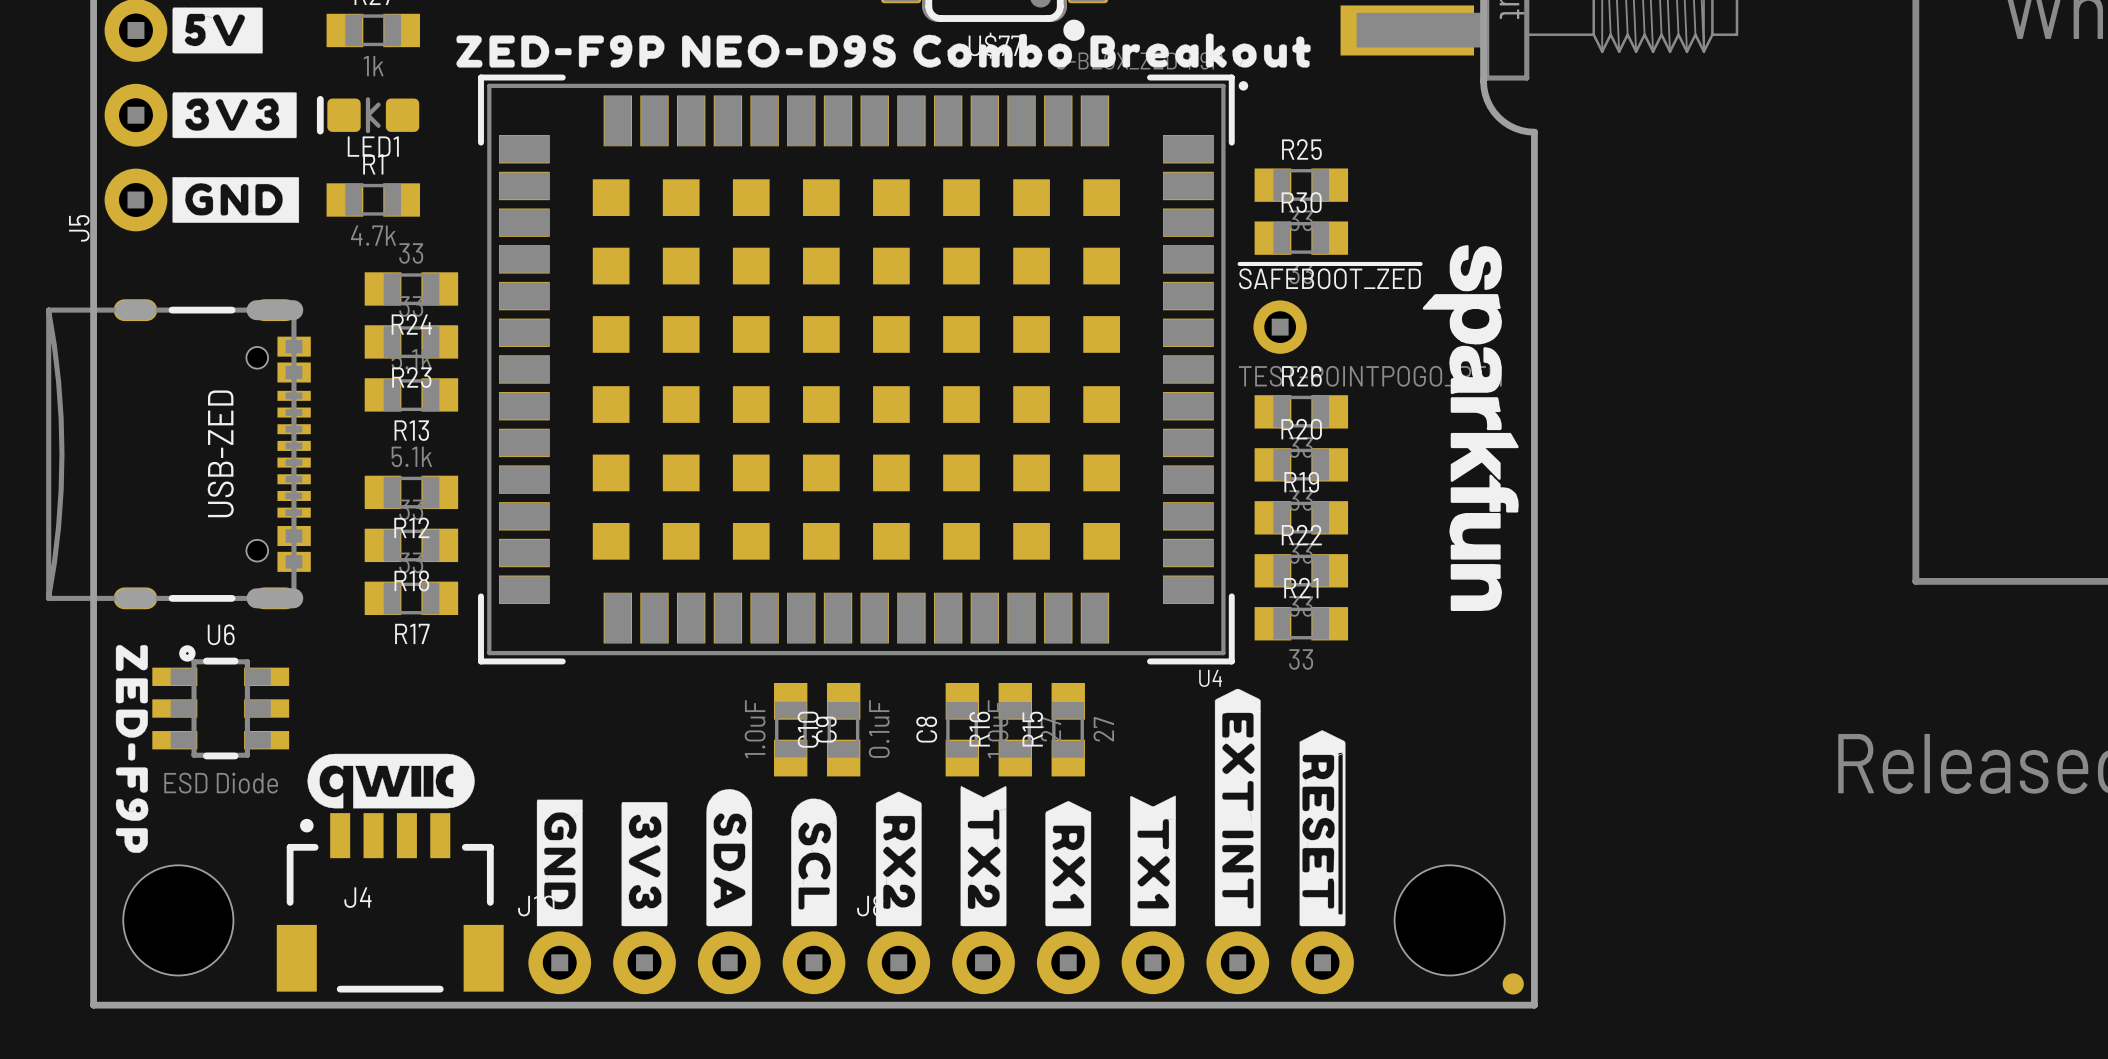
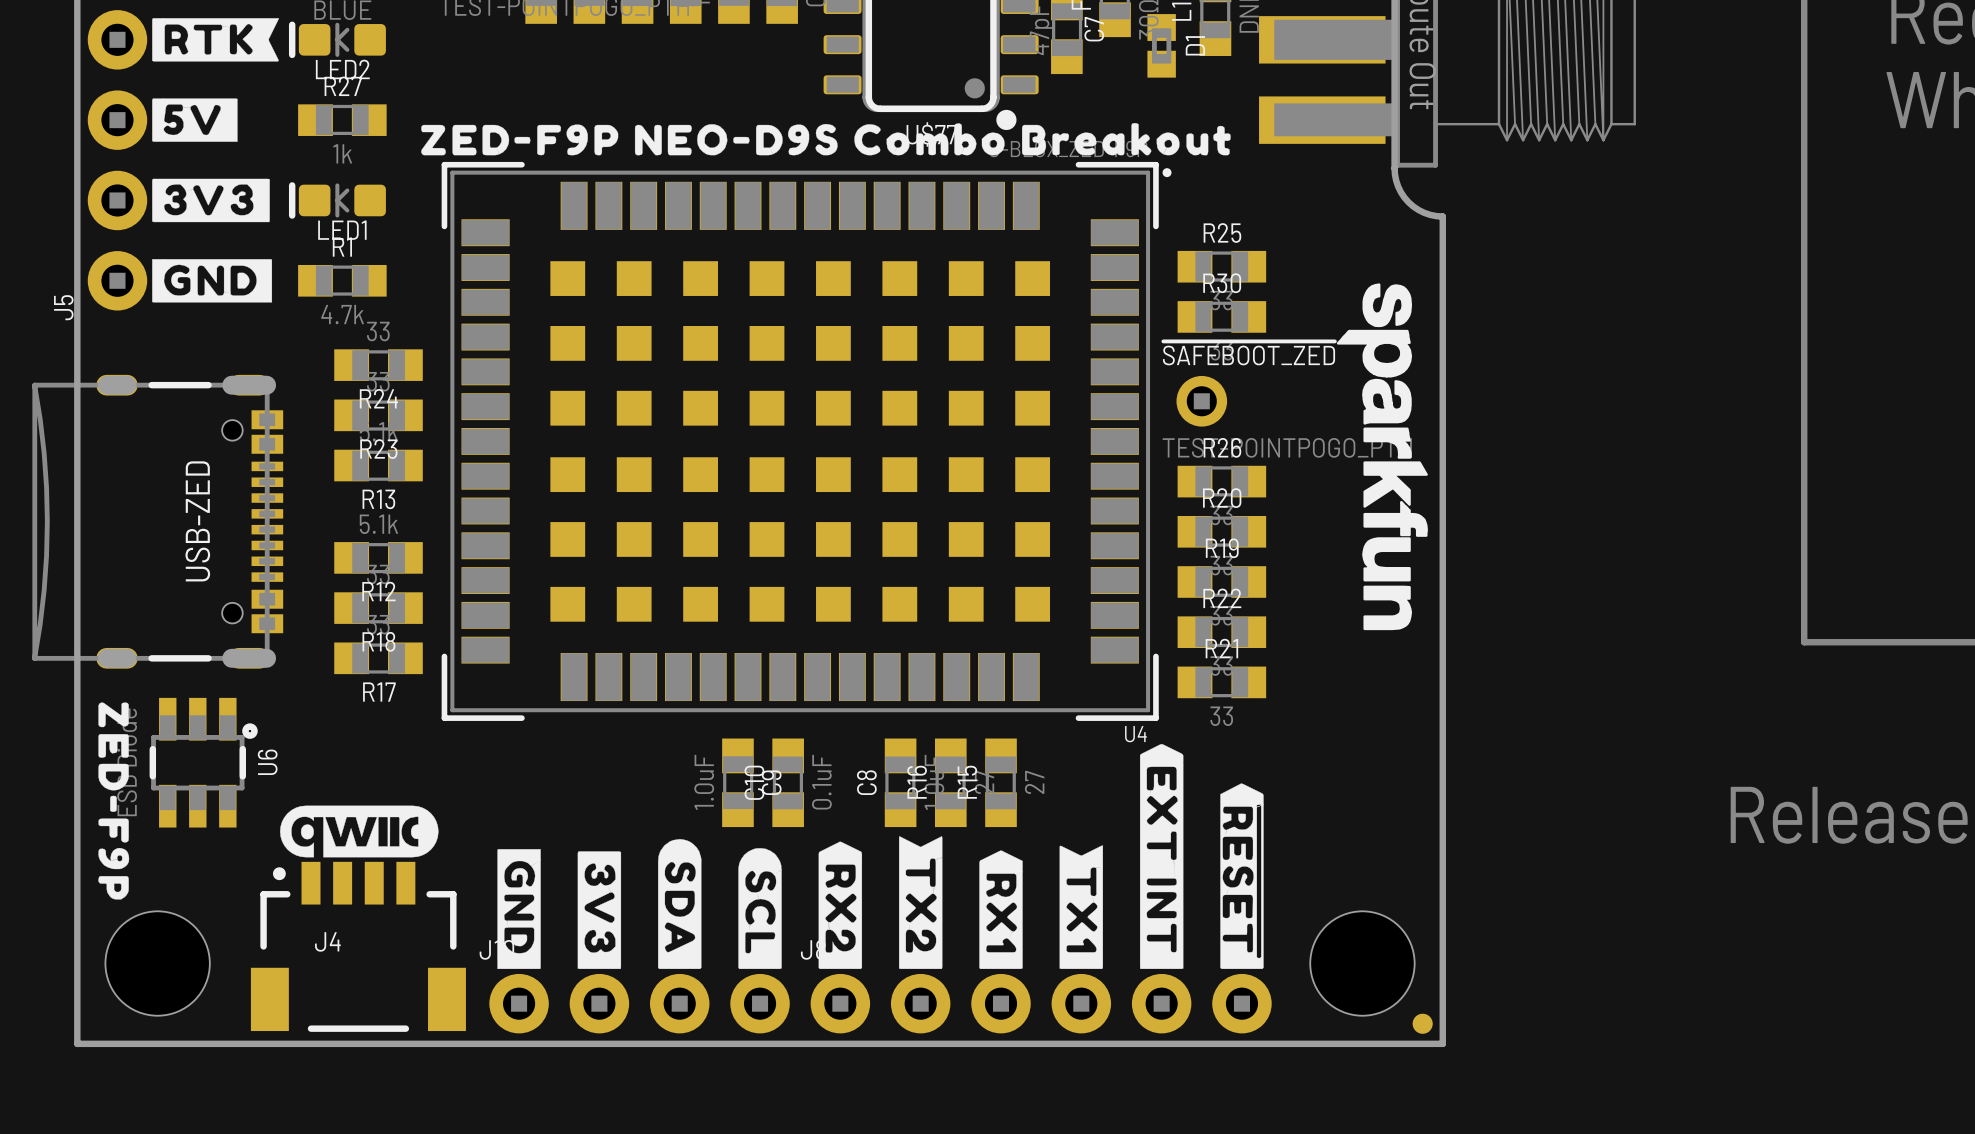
drawing position: (1470, 428) -> (1382, 456)
U6 rotation: 0° (220, 702) -> 90° clockwise (203, 762)

